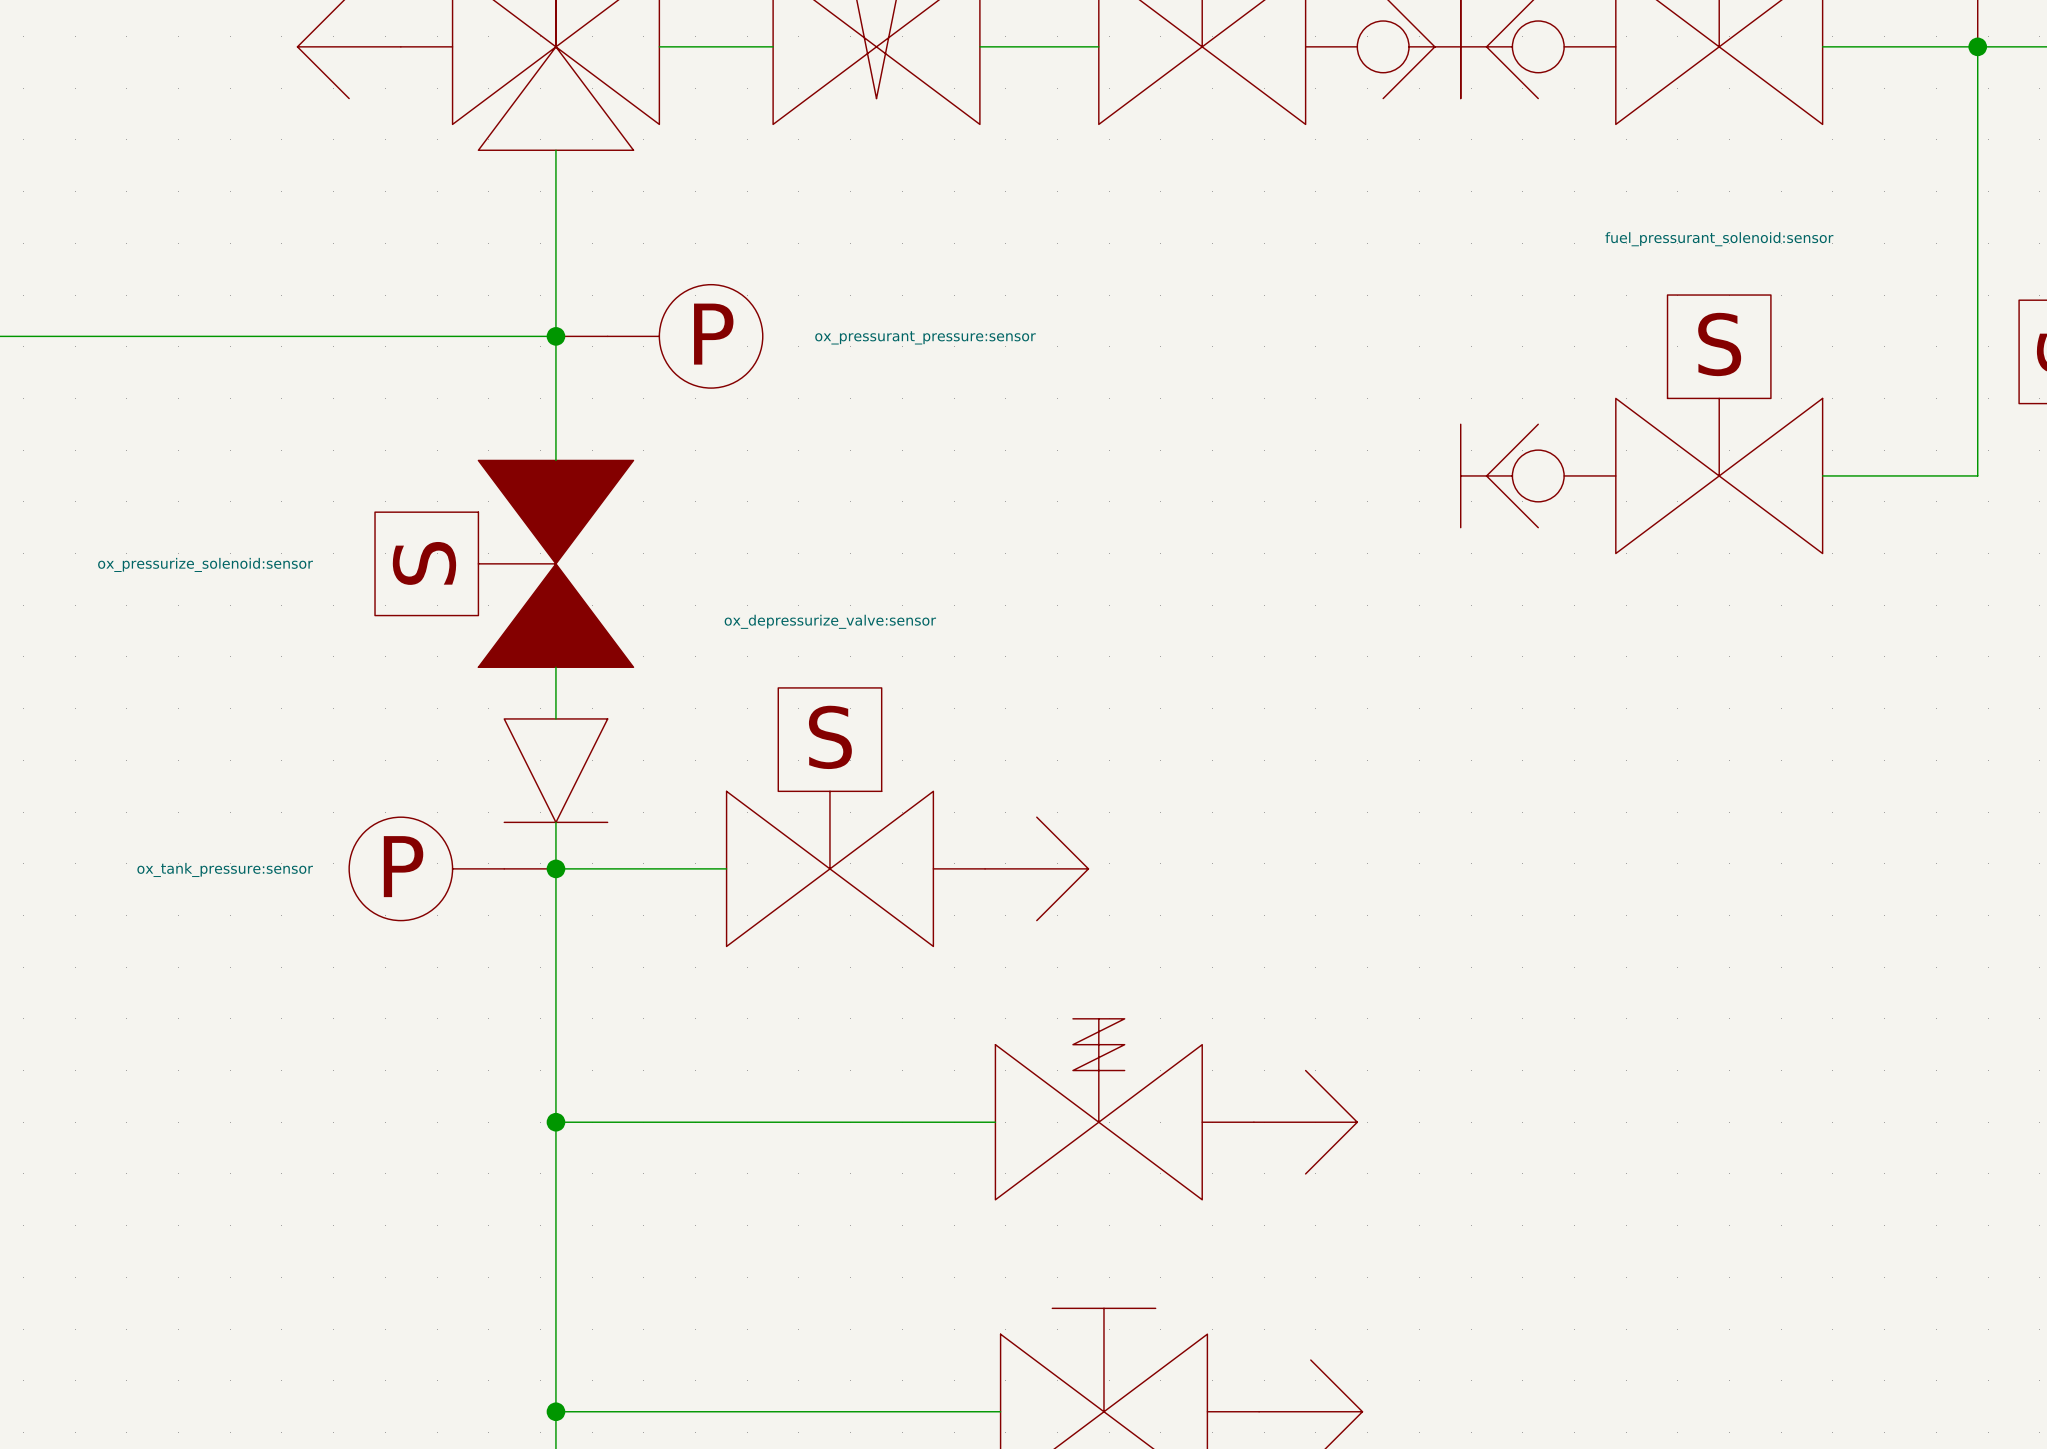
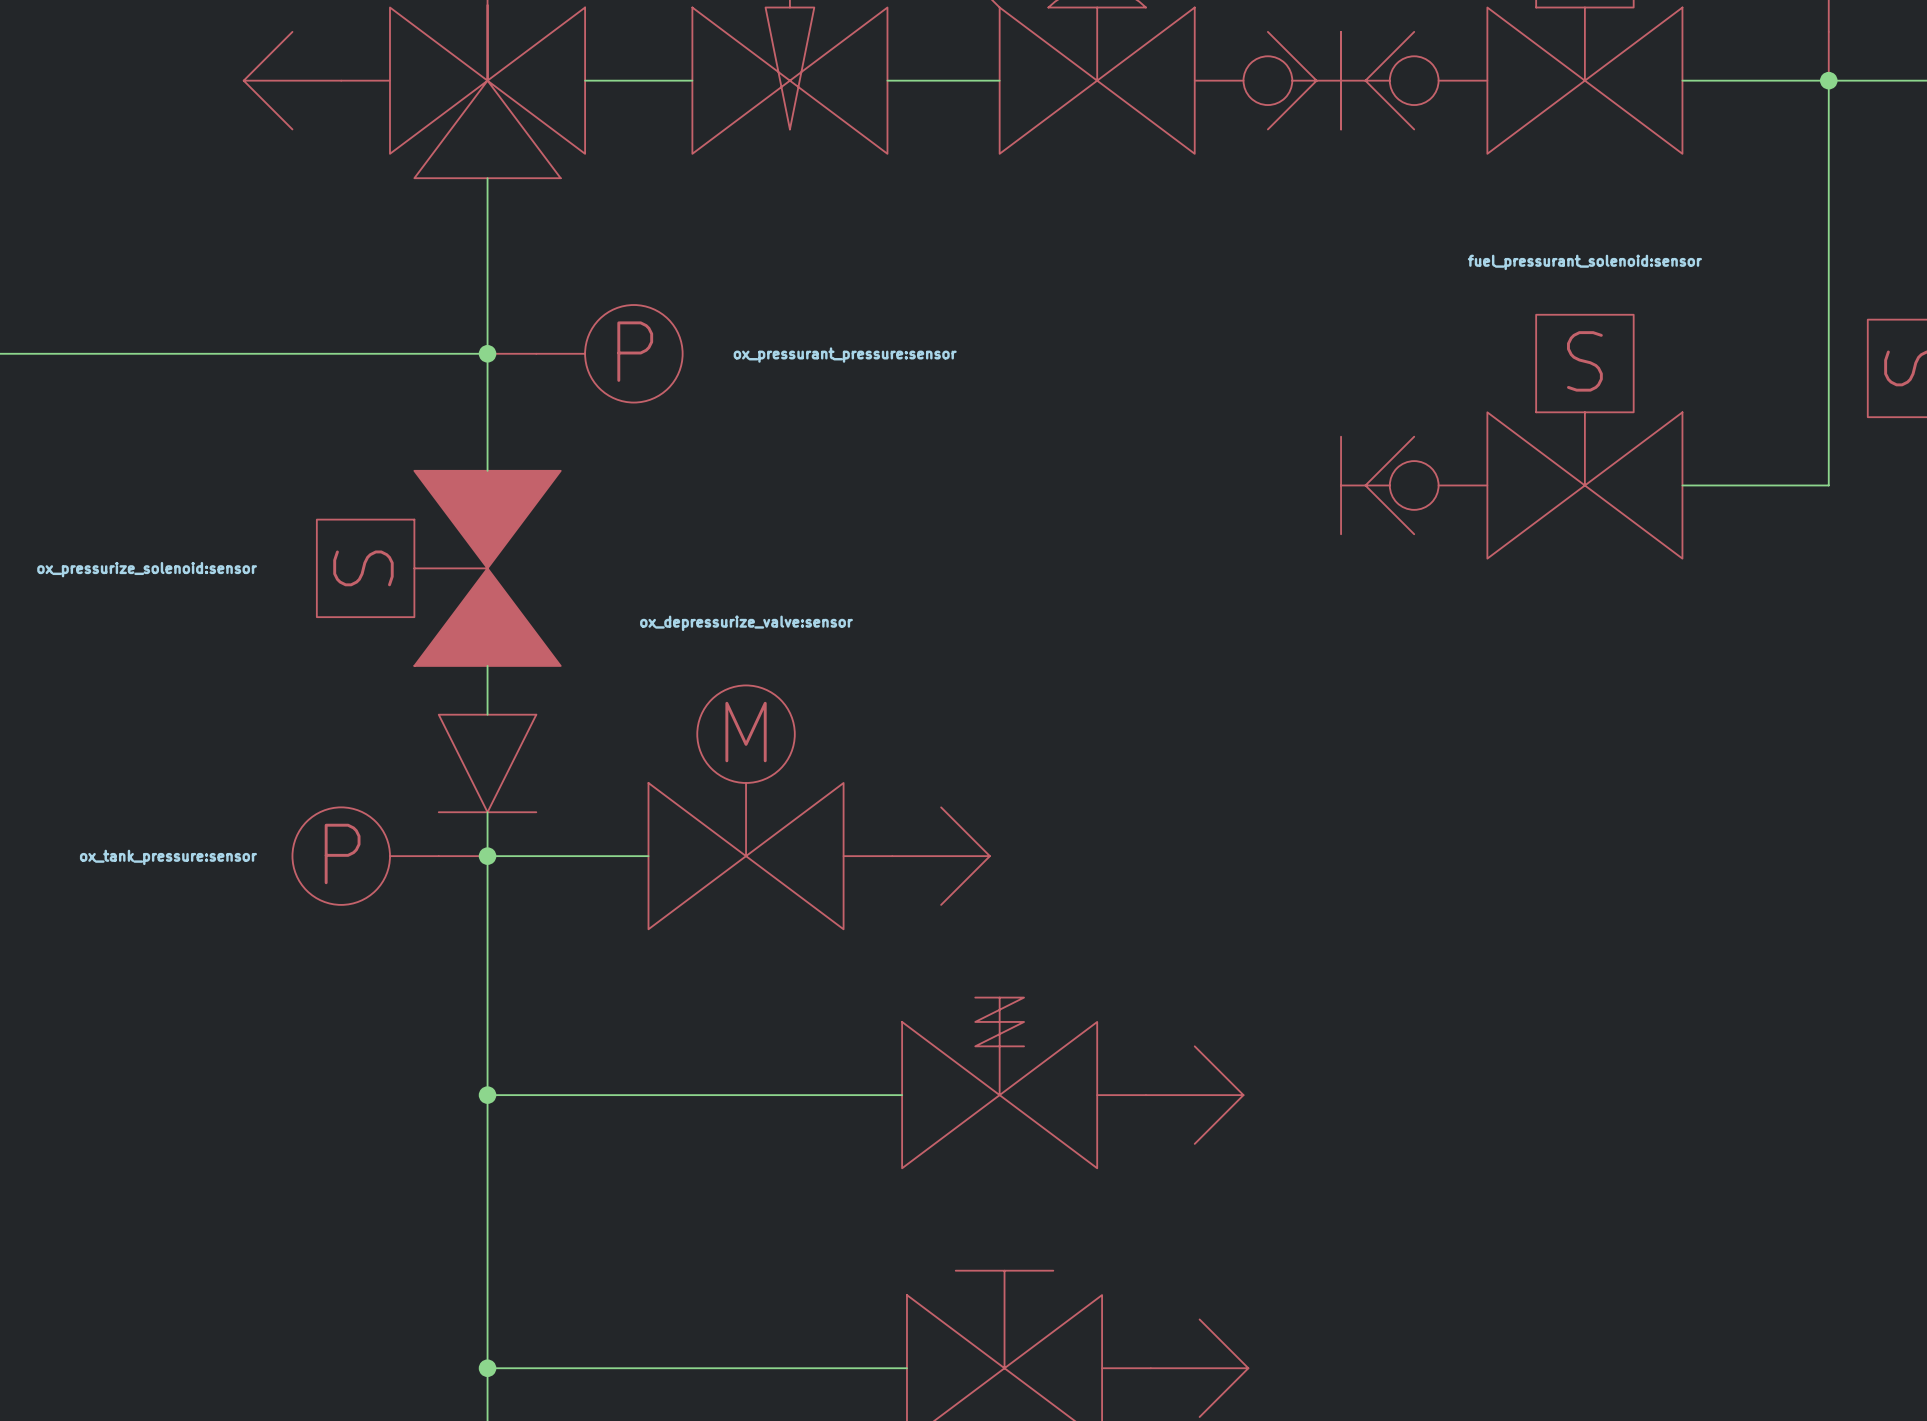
part symbol: [726, 687, 934, 947] -> [648, 685, 844, 930]

